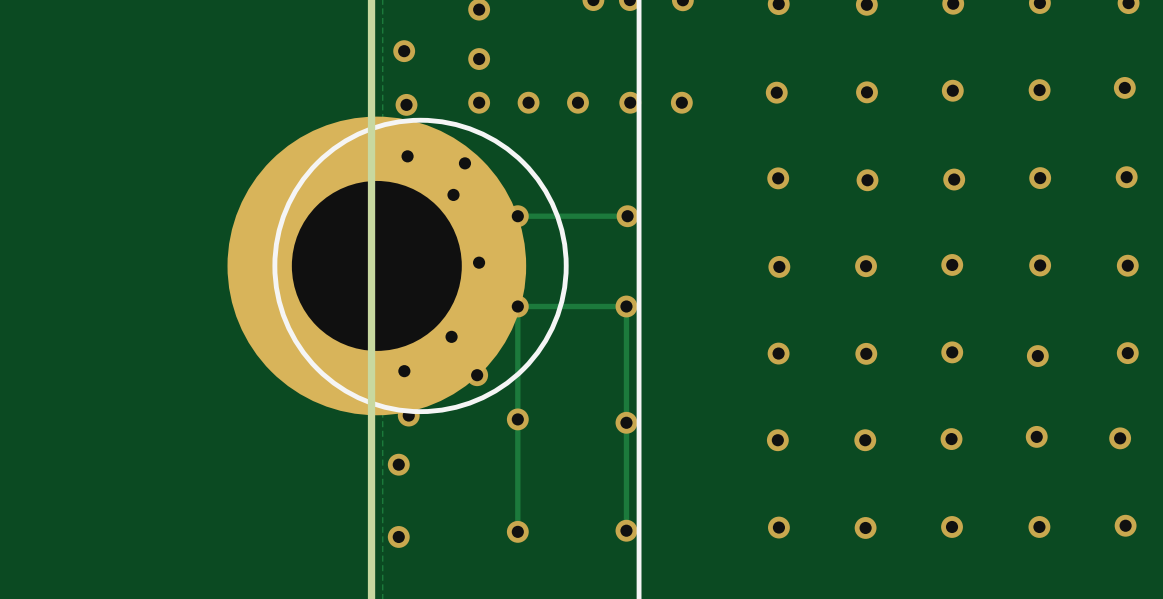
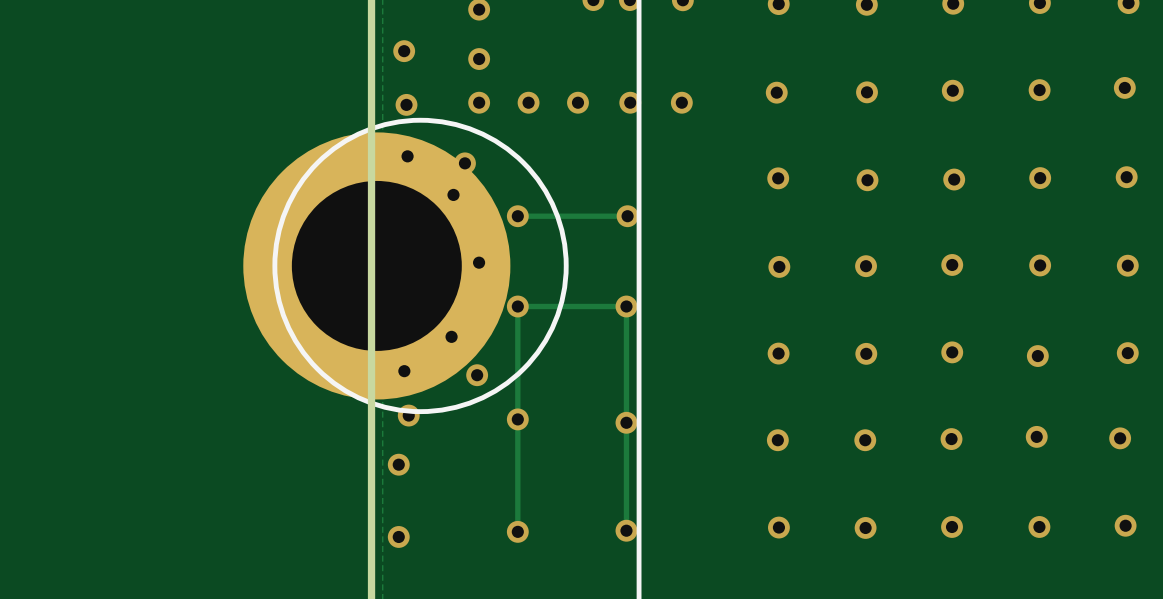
part footprint: [227, 116, 527, 416] -> [243, 132, 511, 400]

